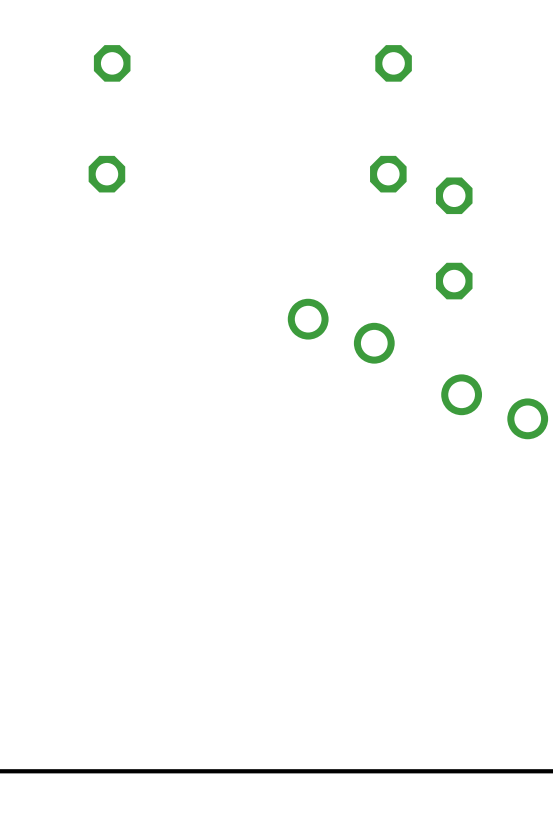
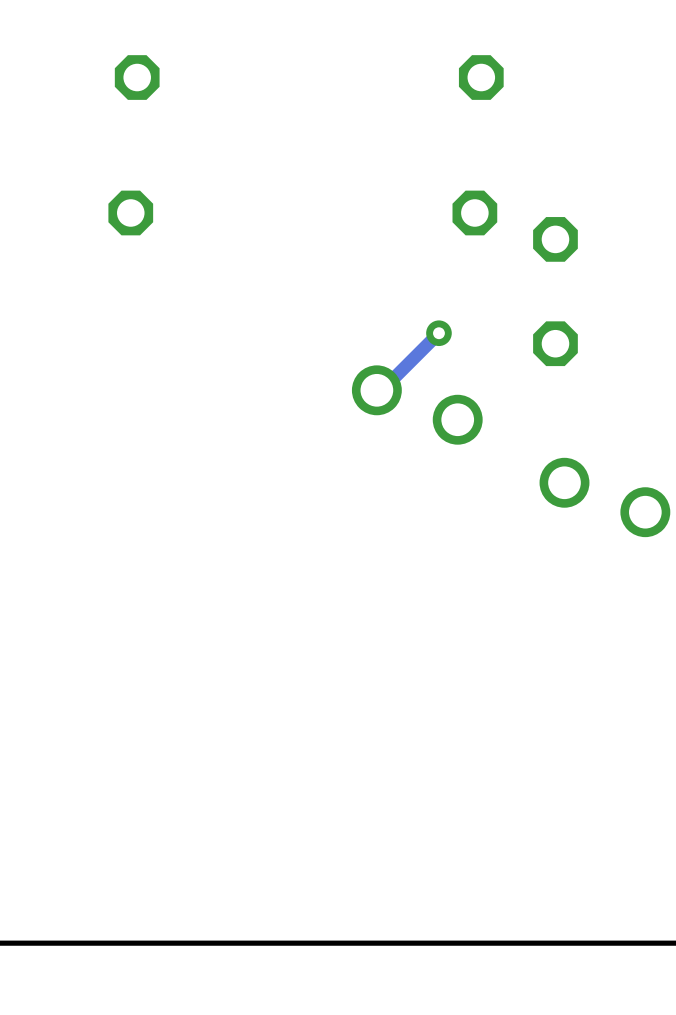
track: none -> (438, 333) (381, 390) (376, 390)
via: none -> (438, 333)

